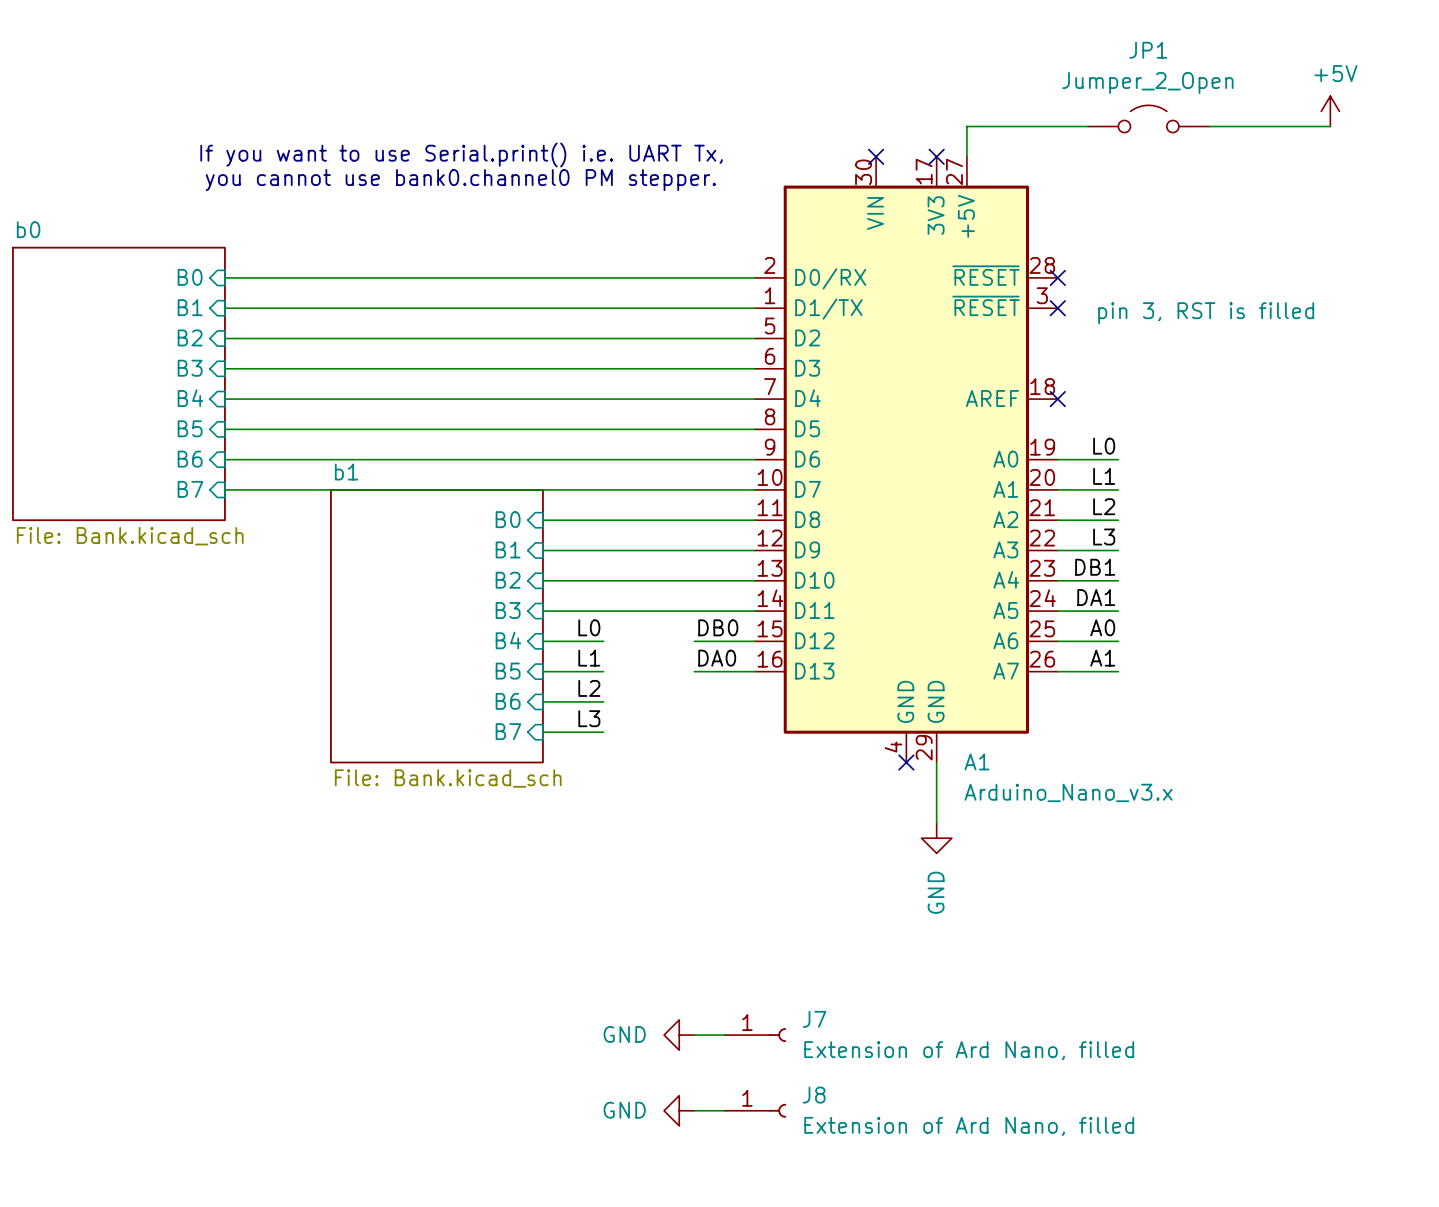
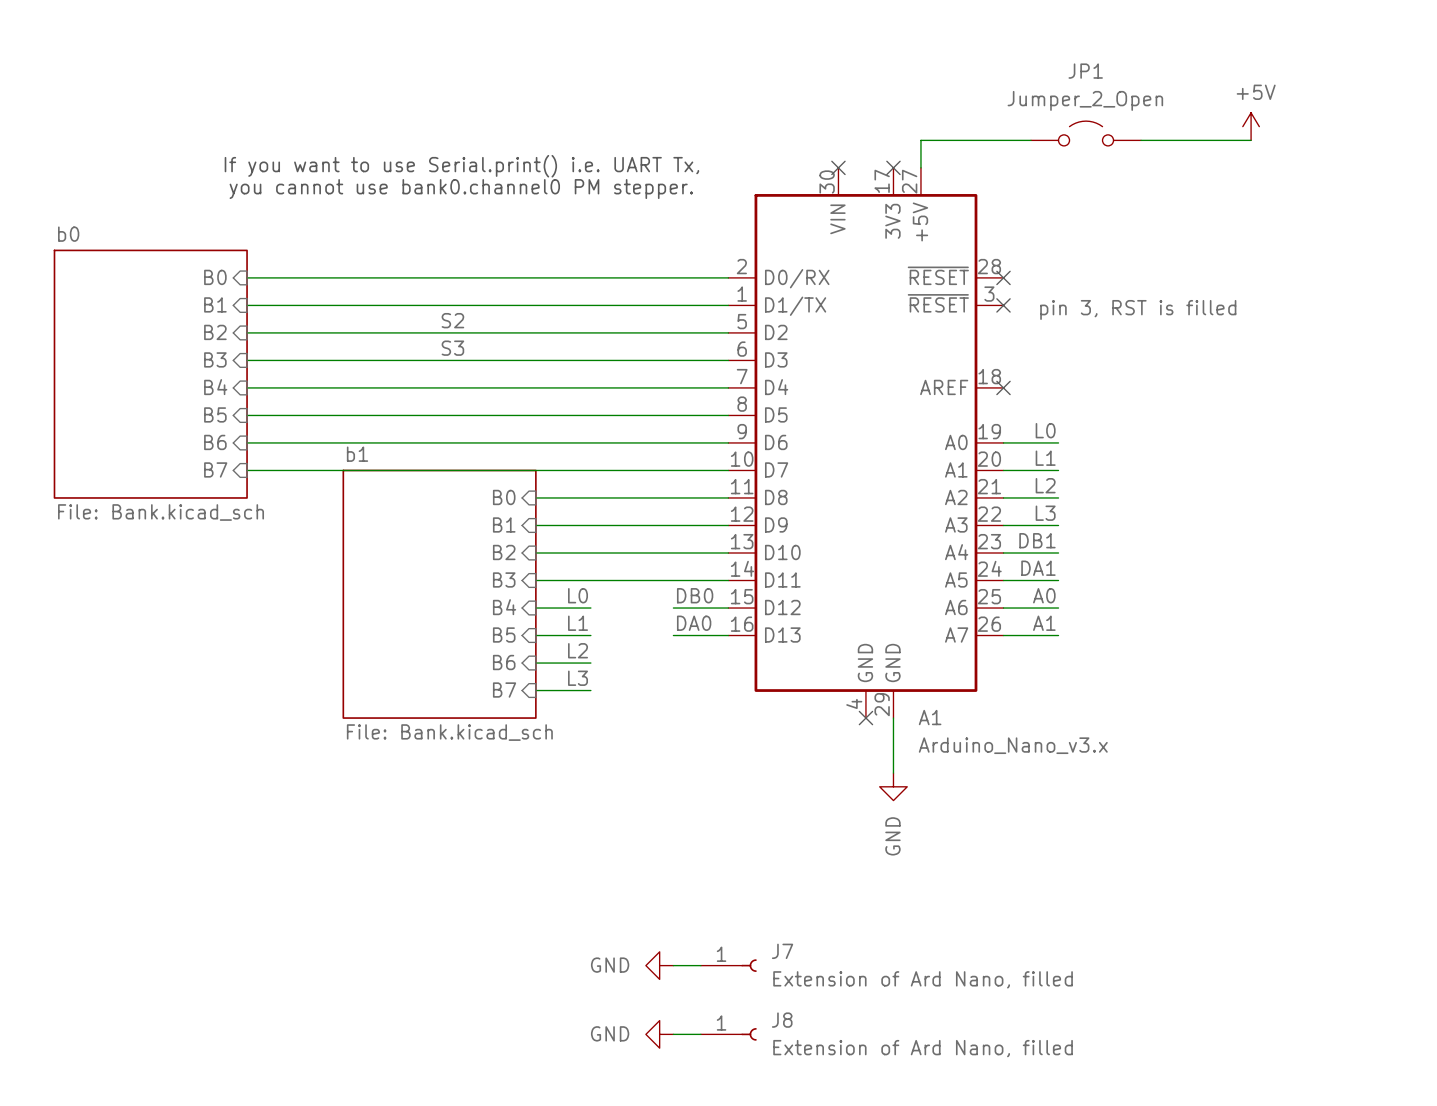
label: none -> S2 (452, 320)
label: none -> S3 (452, 348)

